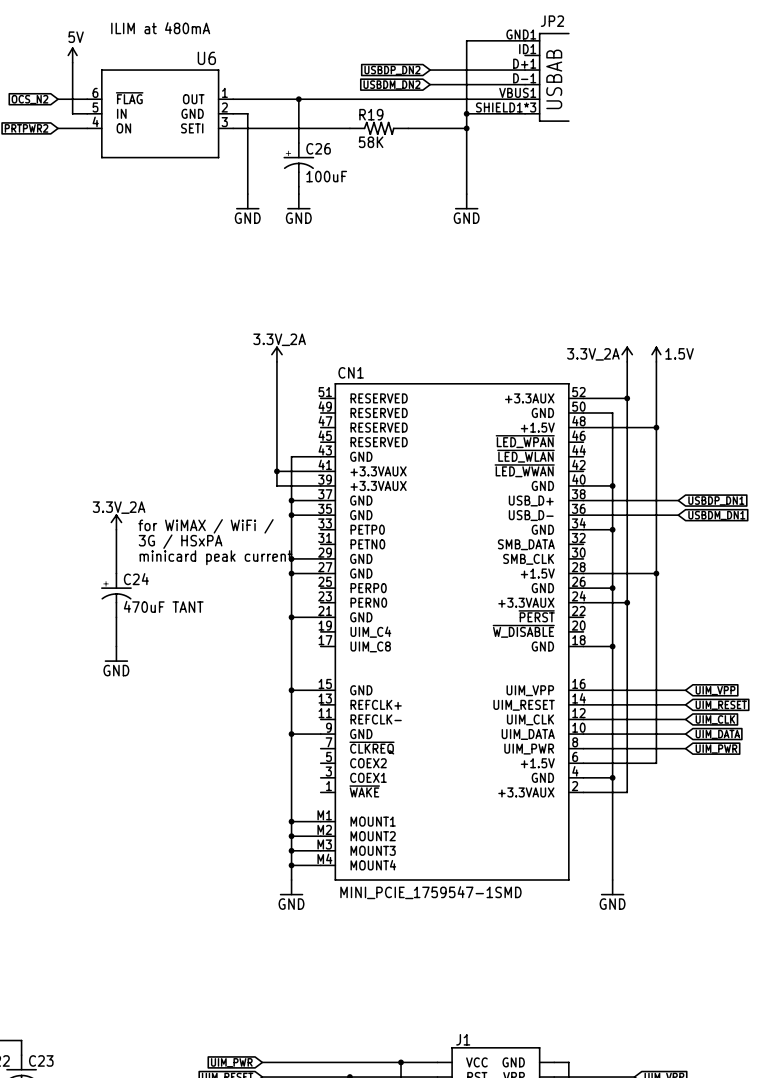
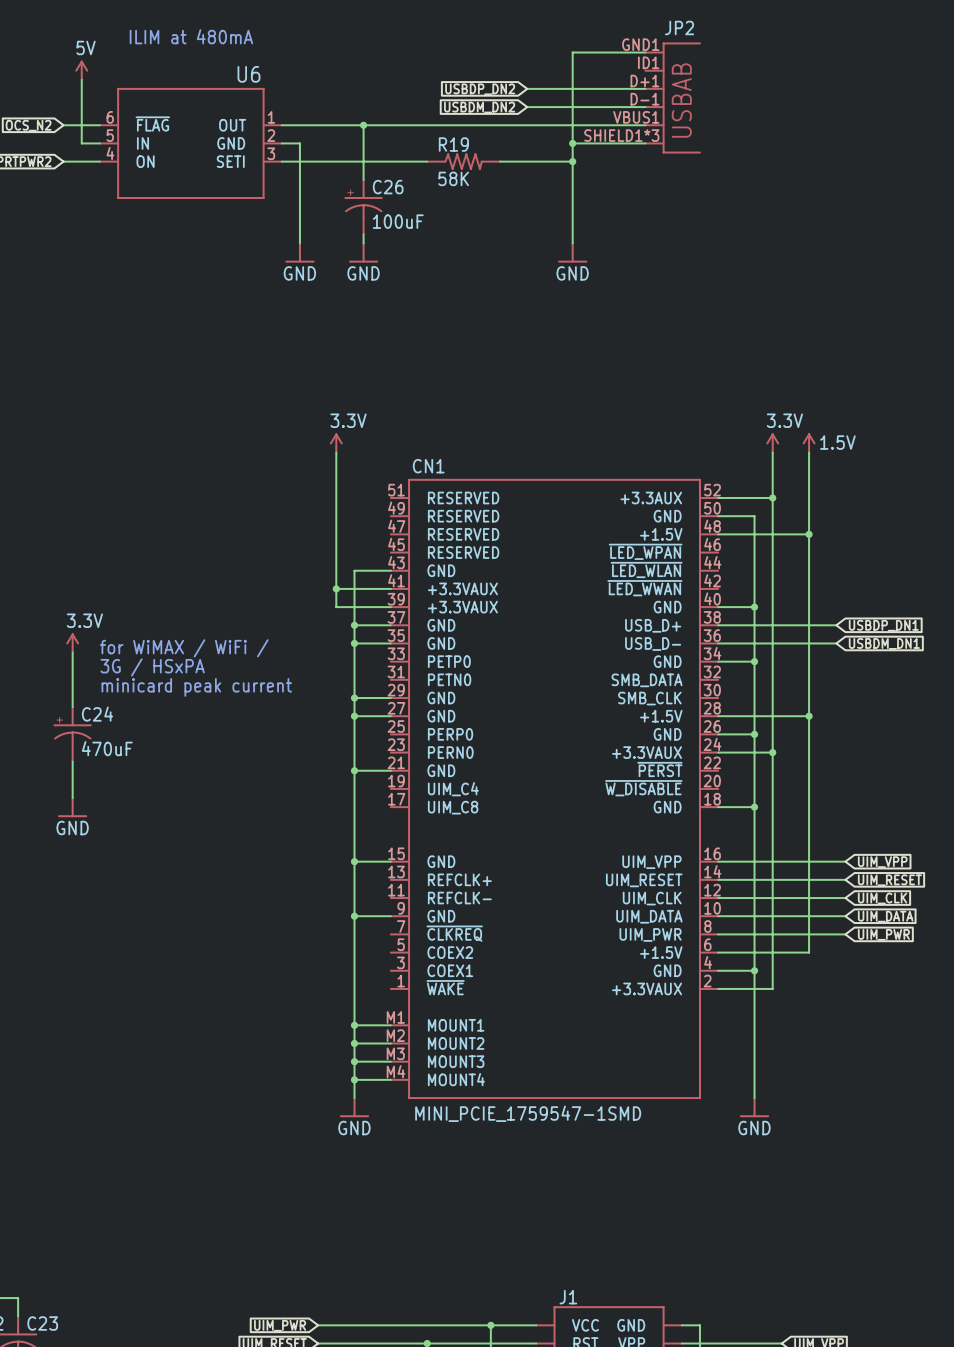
power symbol: 3.3V_2A (276, 354) -> 3.3V (336, 443)
power symbol: 3.3V_2A (627, 354) -> 3.3V (772, 443)
power symbol: none -> 3.3V (72, 643)
power symbol: 3.3V_2A (116, 522) -> none
text position: for WiMAX / WiFi / (205, 526) -> for WiMAX / WiFi / (184, 648)
wire: (116, 529) (116, 573) -> (72, 652) (72, 707)
text position: 3G / HSxPA (180, 541) -> 3G / HSxPA (152, 667)
text position: minicard peak current (216, 557) -> minicard peak current (196, 687)
C24 position: (116, 595) -> (72, 734)
C24 value: 470uF TANT (163, 606) -> 470uF (107, 748)
wire: (116, 617) (116, 646) -> (72, 761) (72, 798)
power symbol position: GND (116, 654) -> GND (72, 807)

